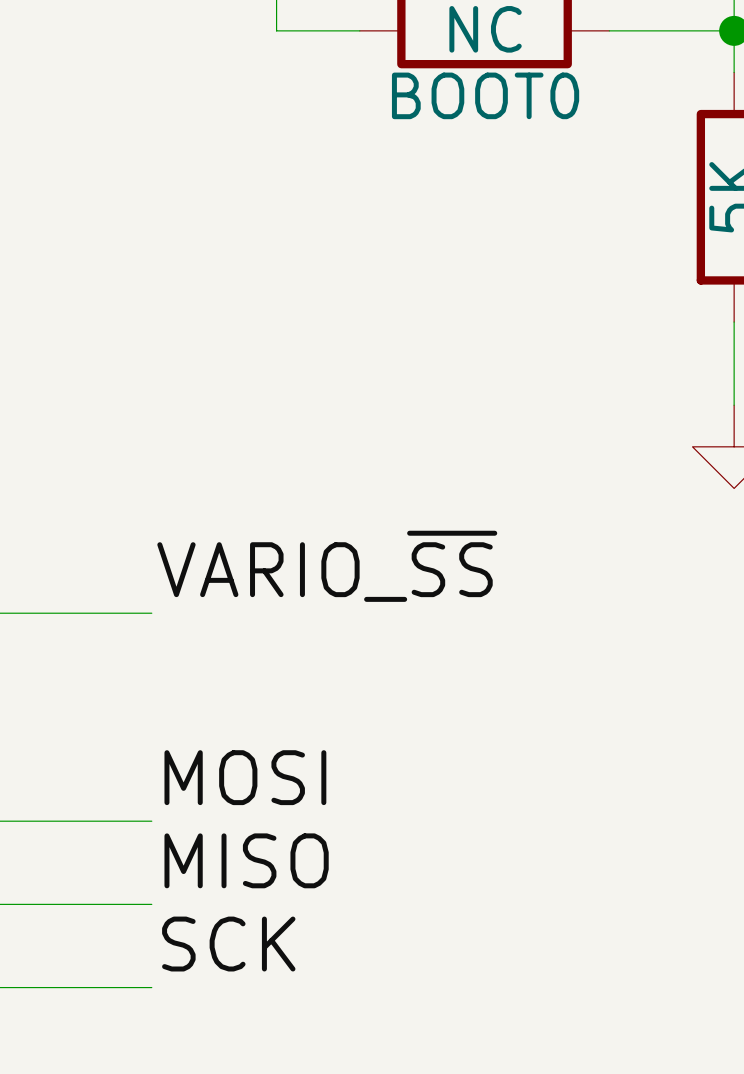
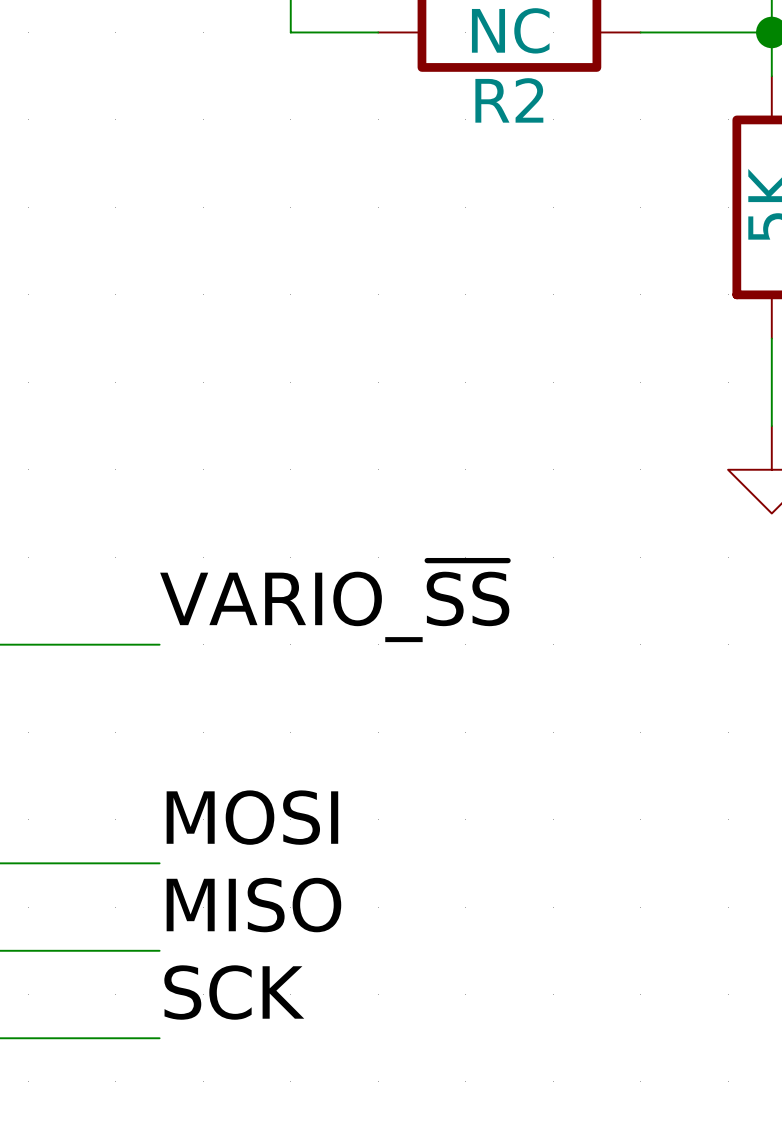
BOOT0 name: BOOT0 (485, 95) -> R2 (509, 100)

